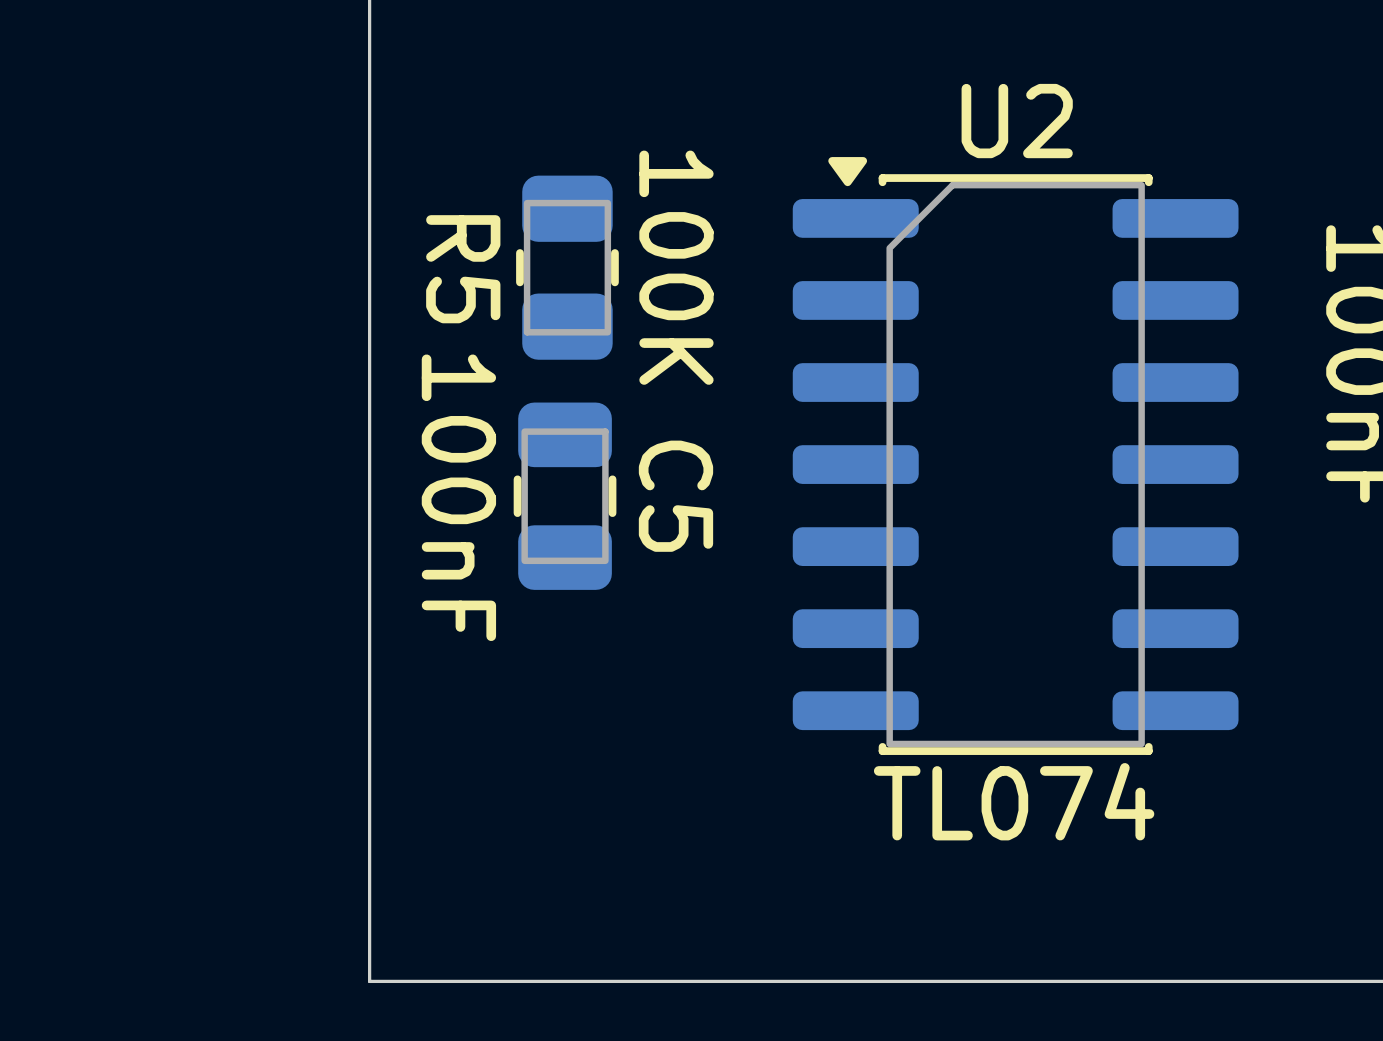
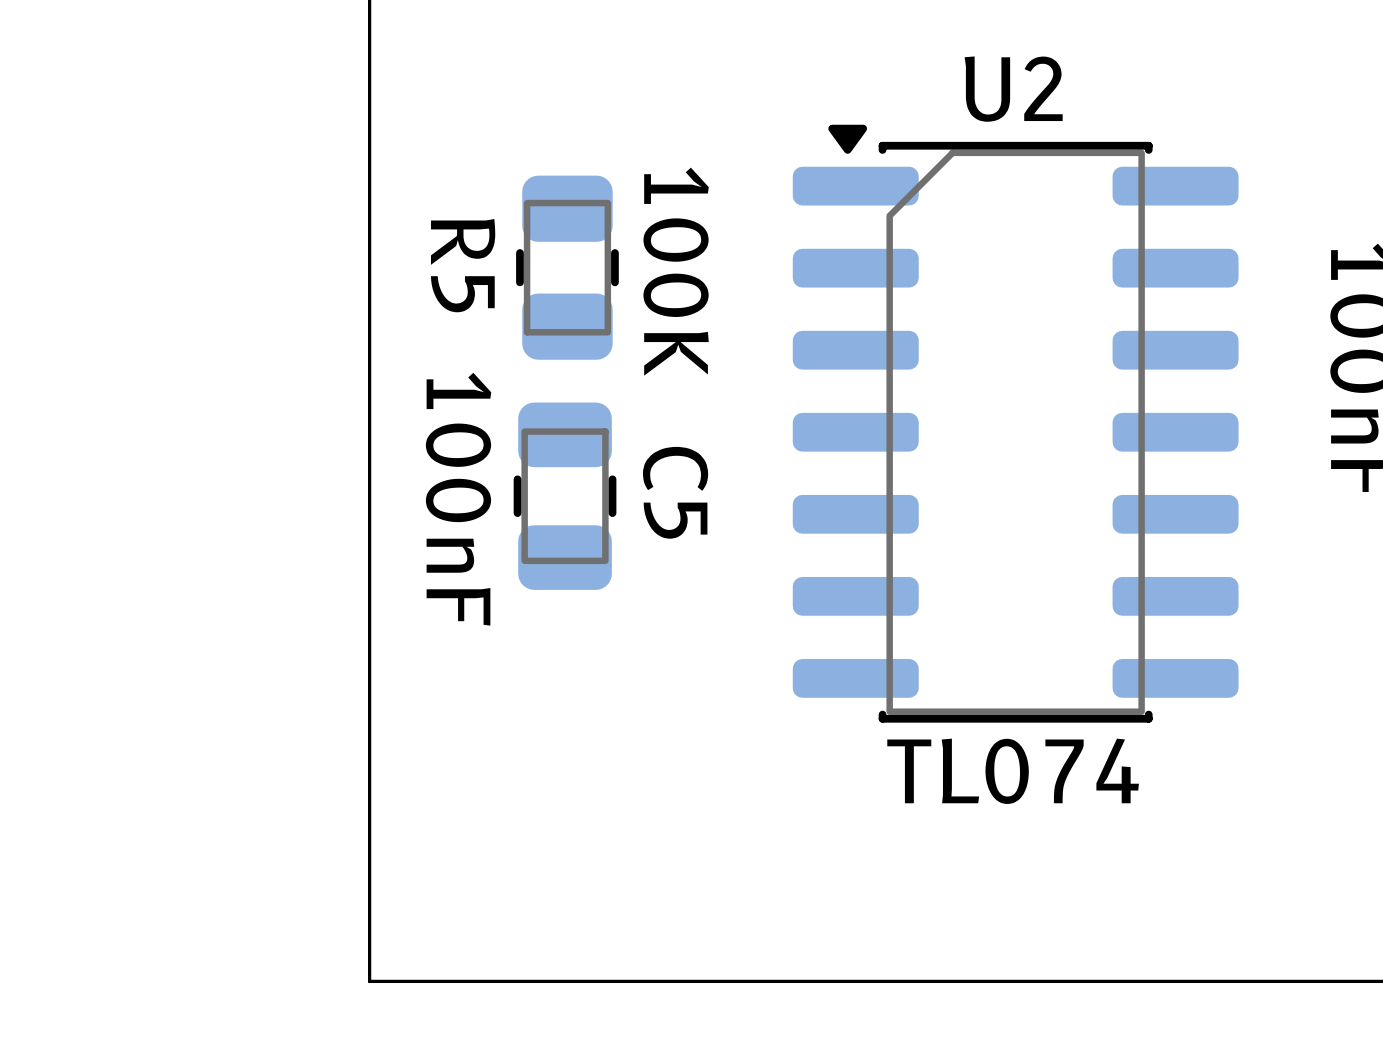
U2 position: (1015, 456) -> (1015, 423)

